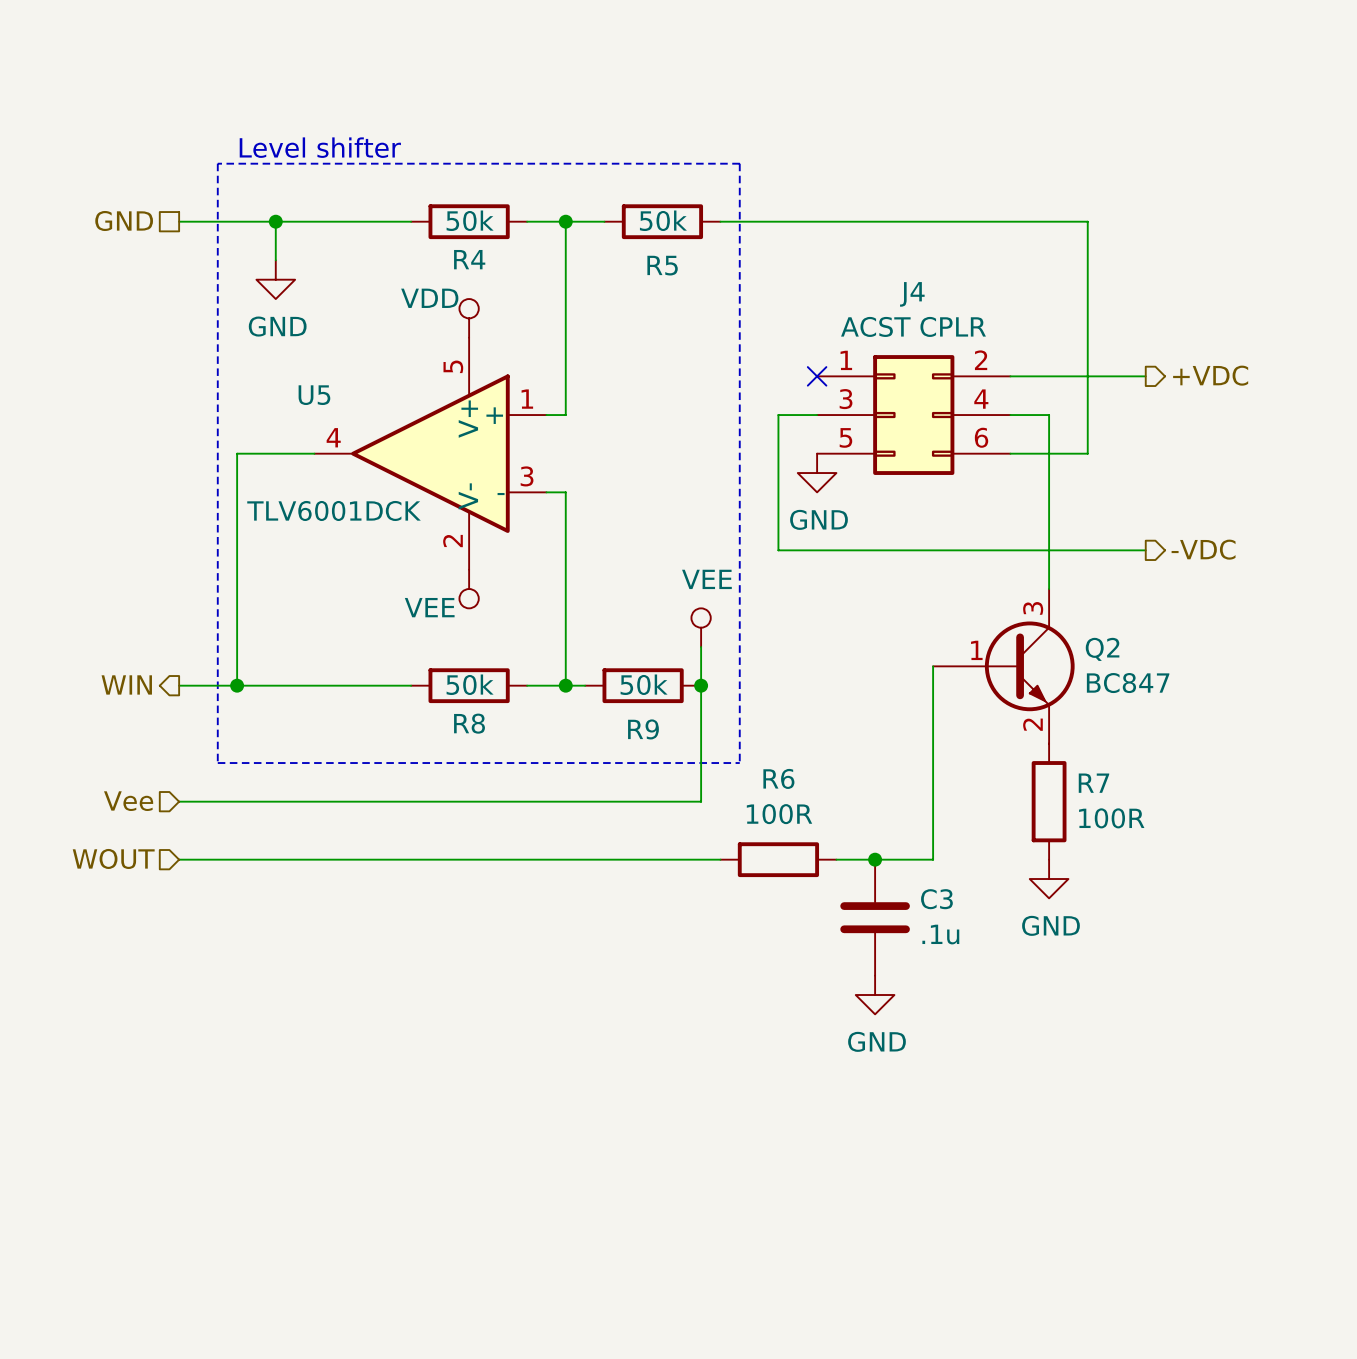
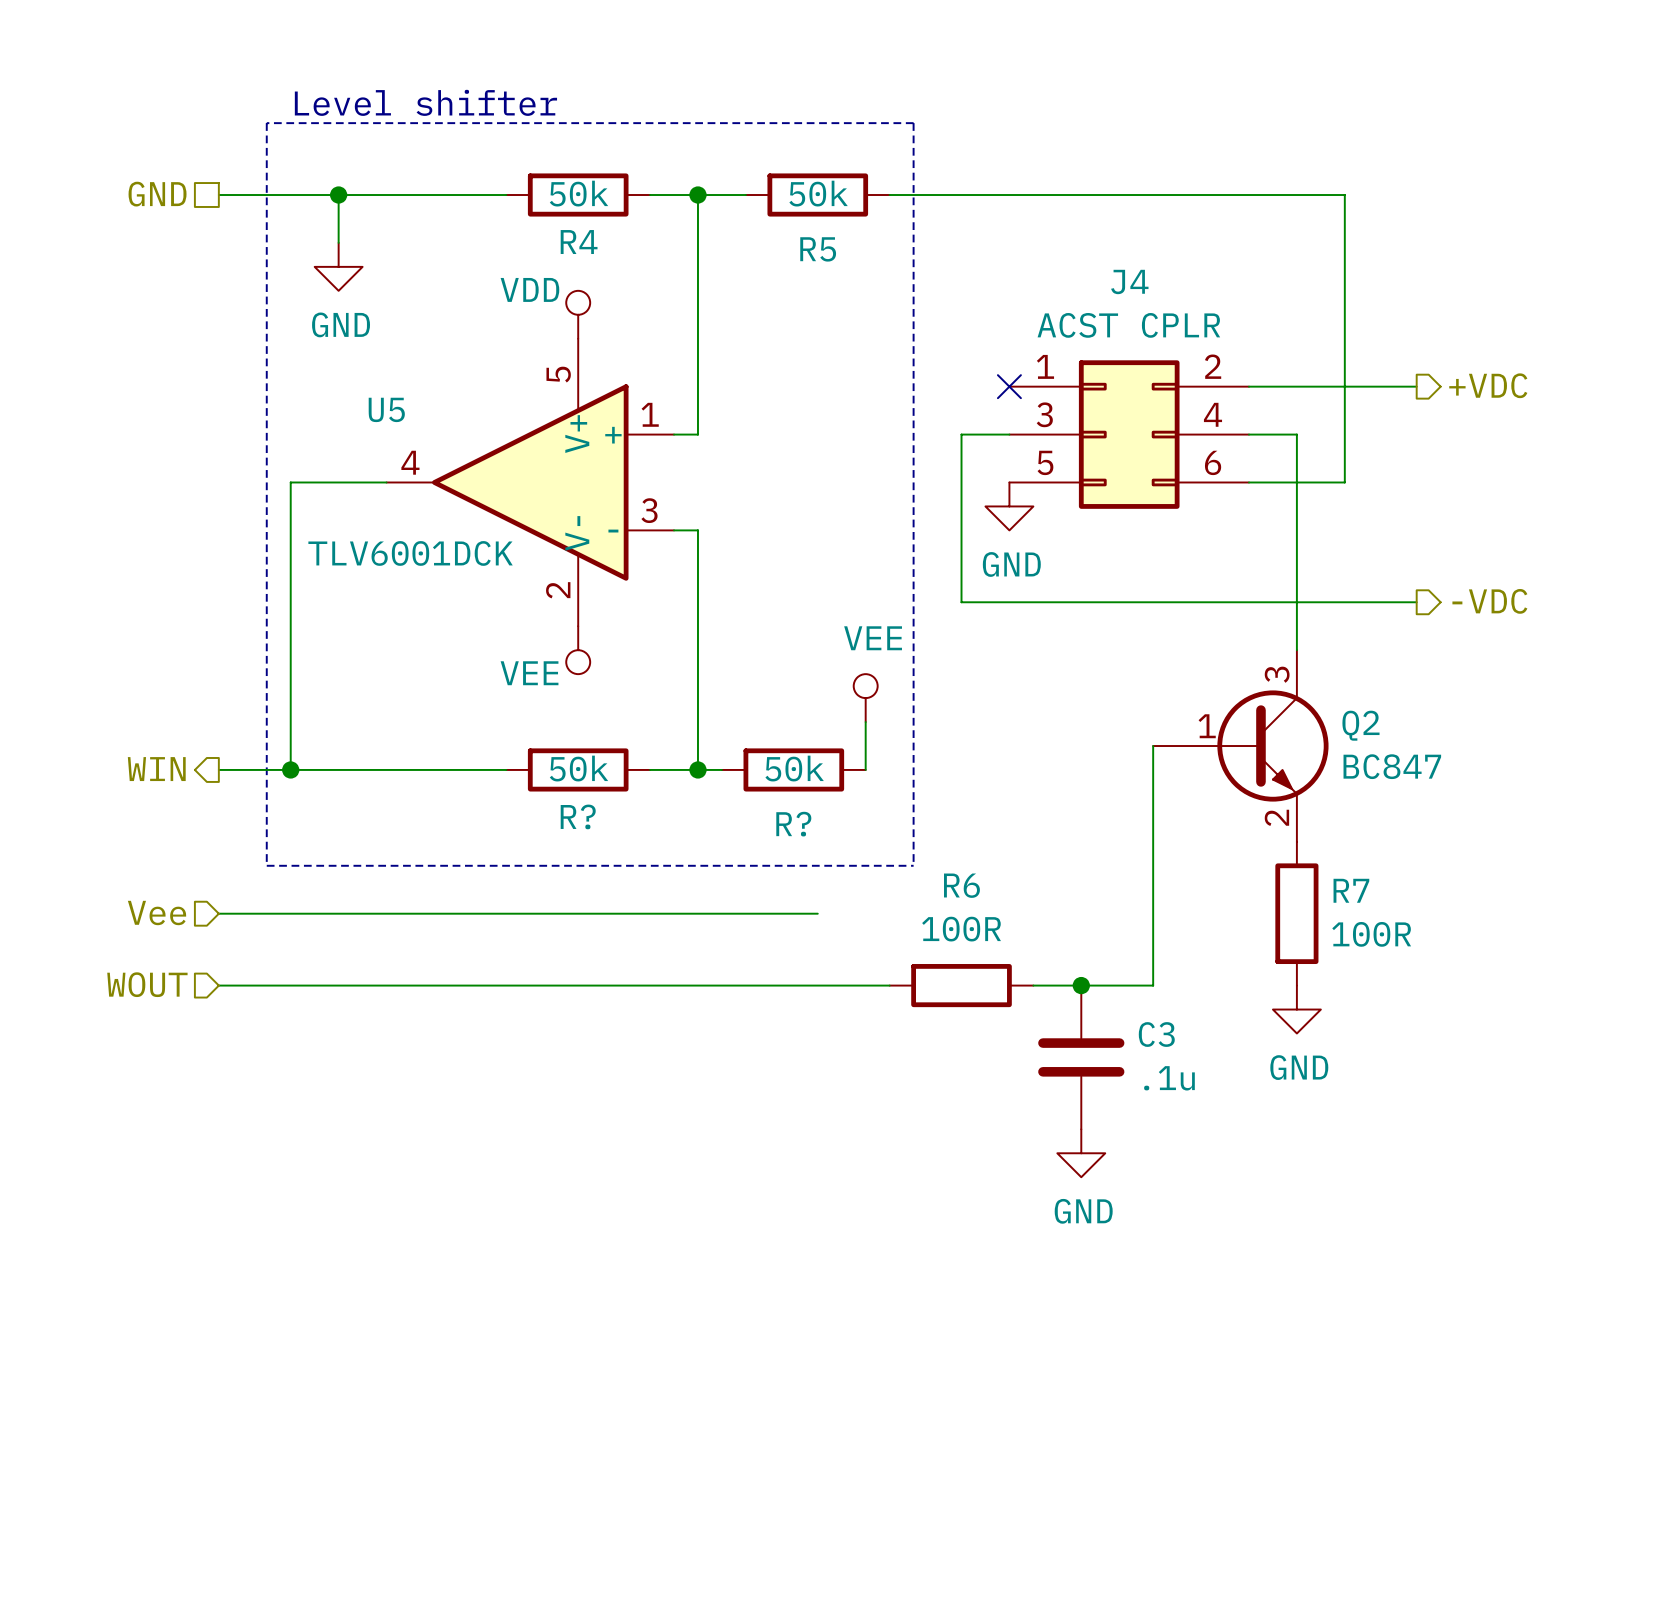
wire: (701, 685) (701, 801) (662, 801) -> none
junction: (701, 685) -> none
R8 name: R8 (469, 723) -> R? (578, 816)
R9 name: R9 (643, 729) -> R? (793, 824)

